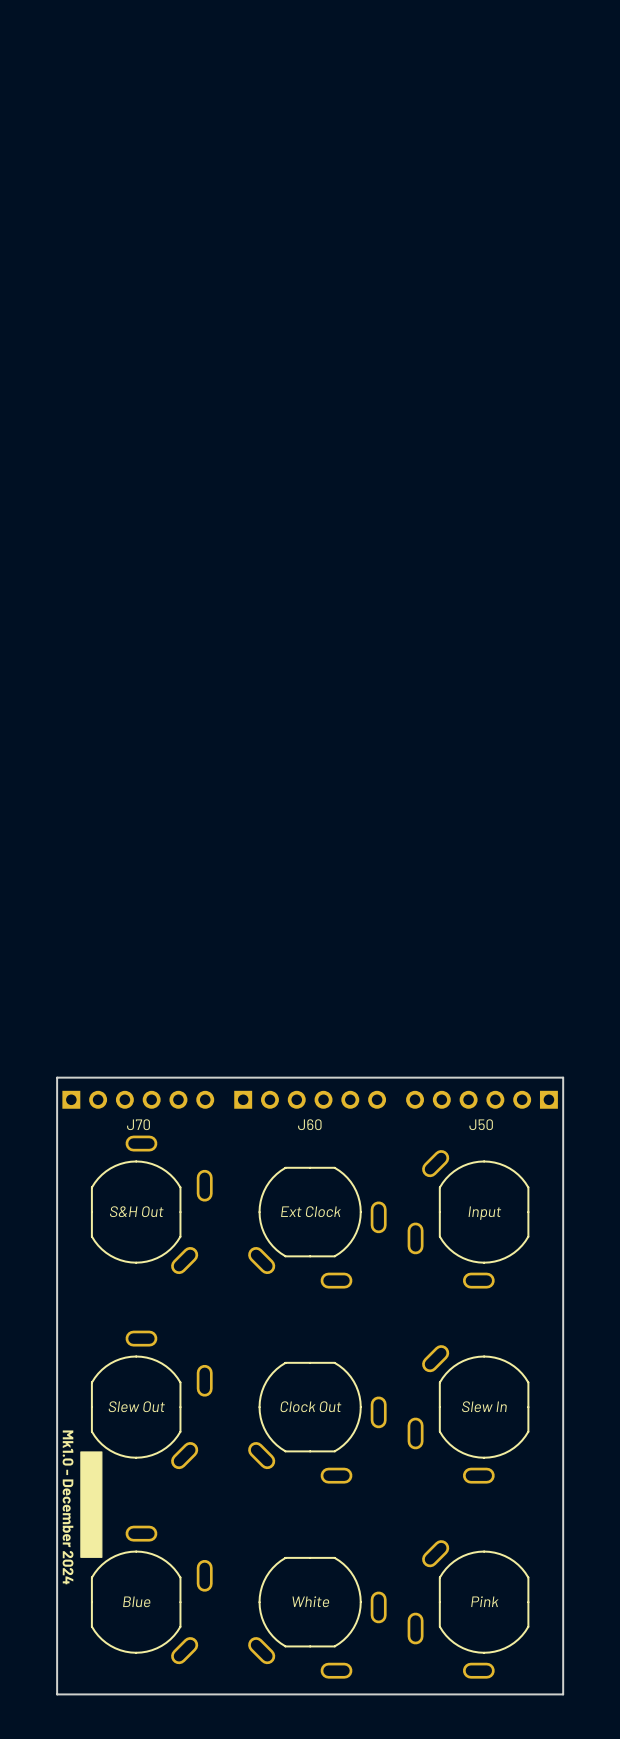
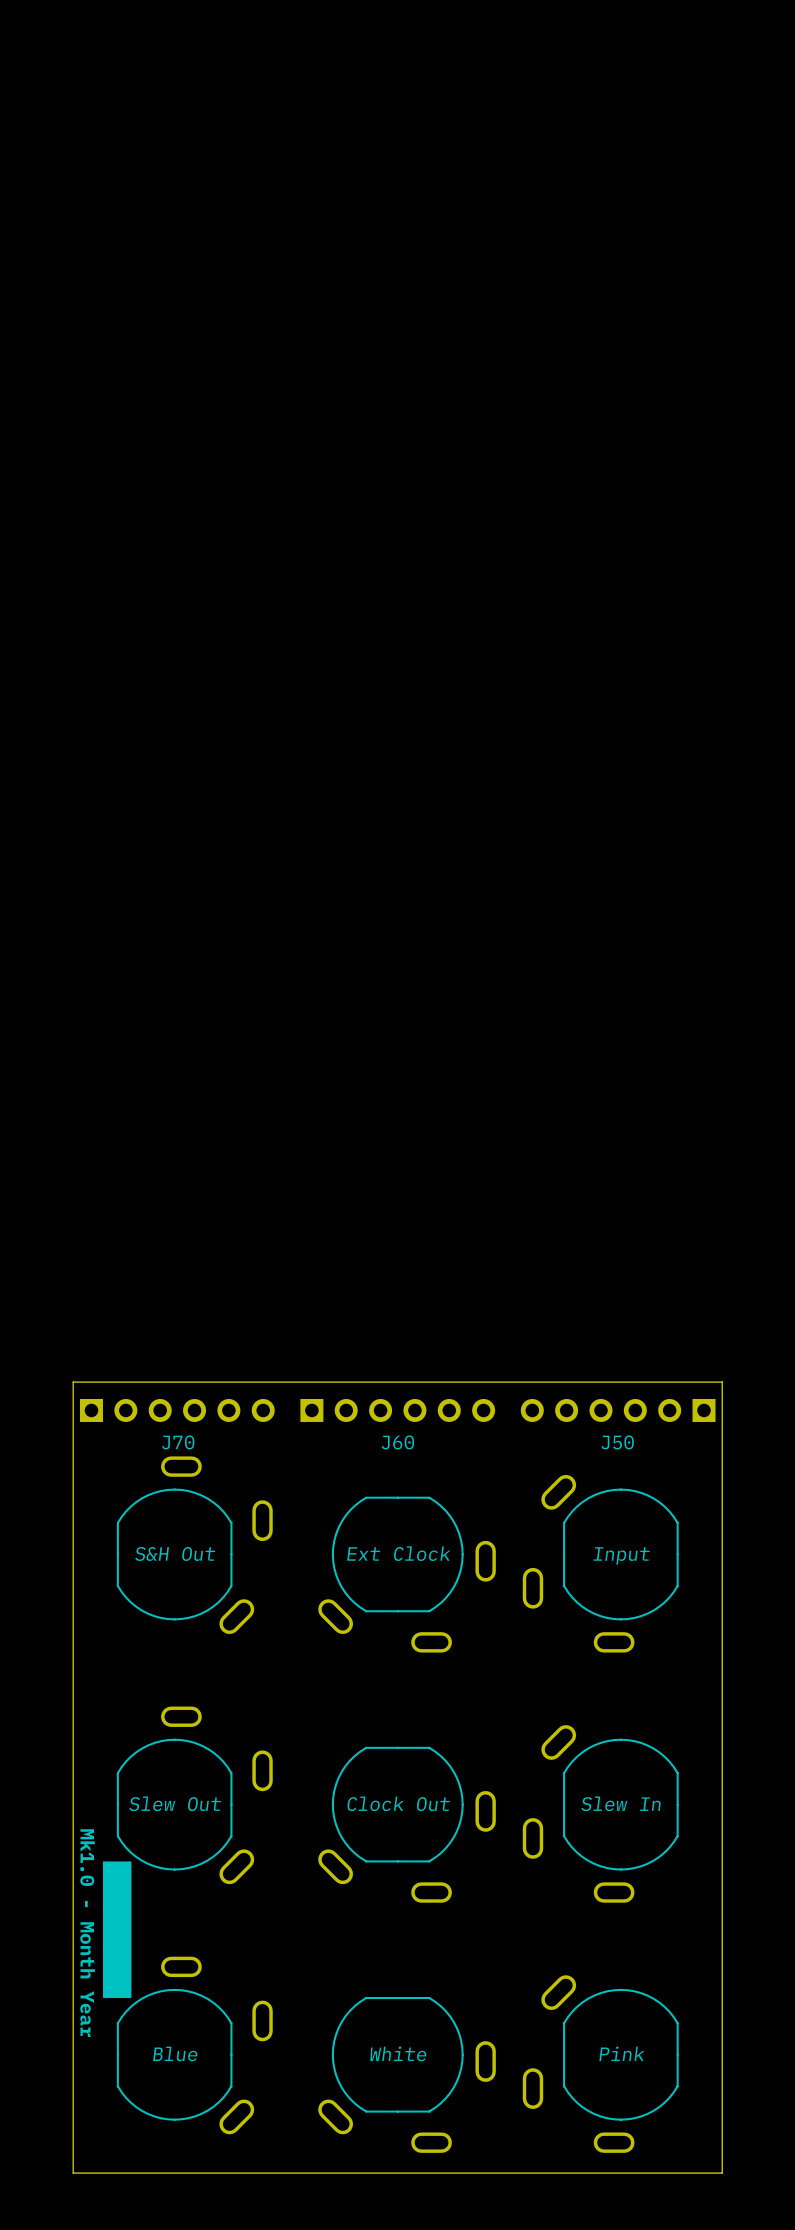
text: Mk1.0 - December 2024 (68, 1507) -> Mk1.0 - Month Year (87, 1933)

